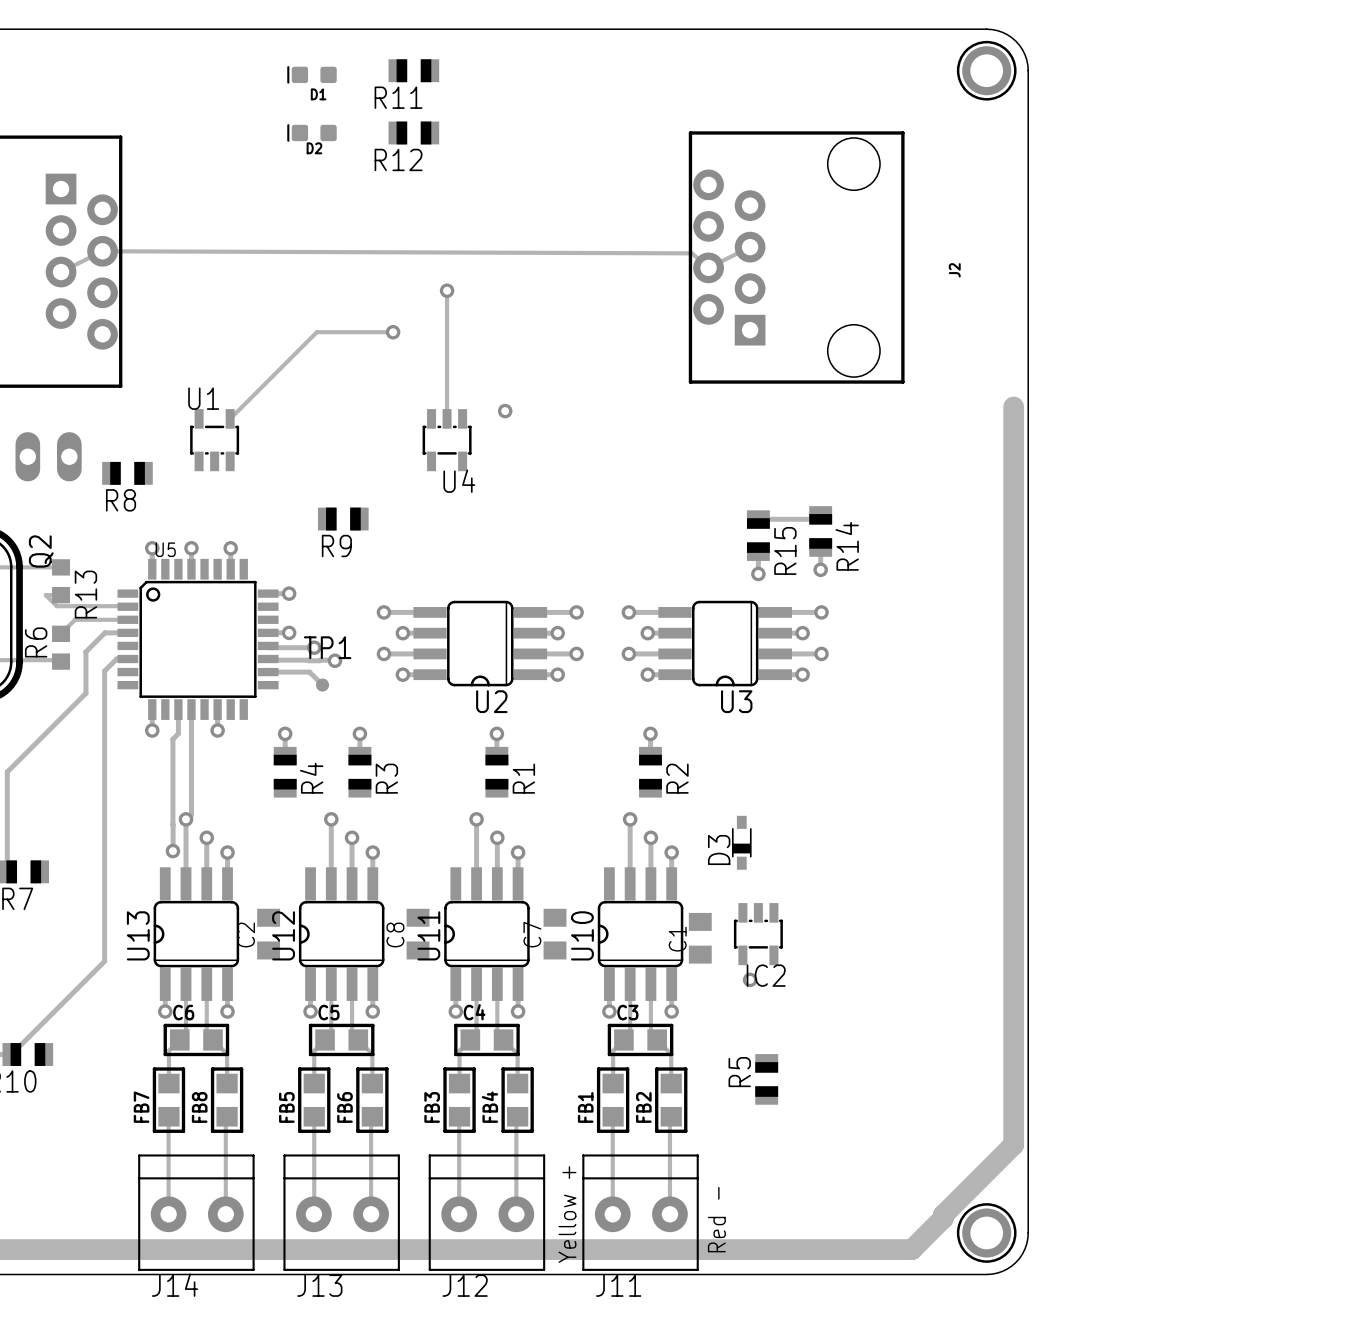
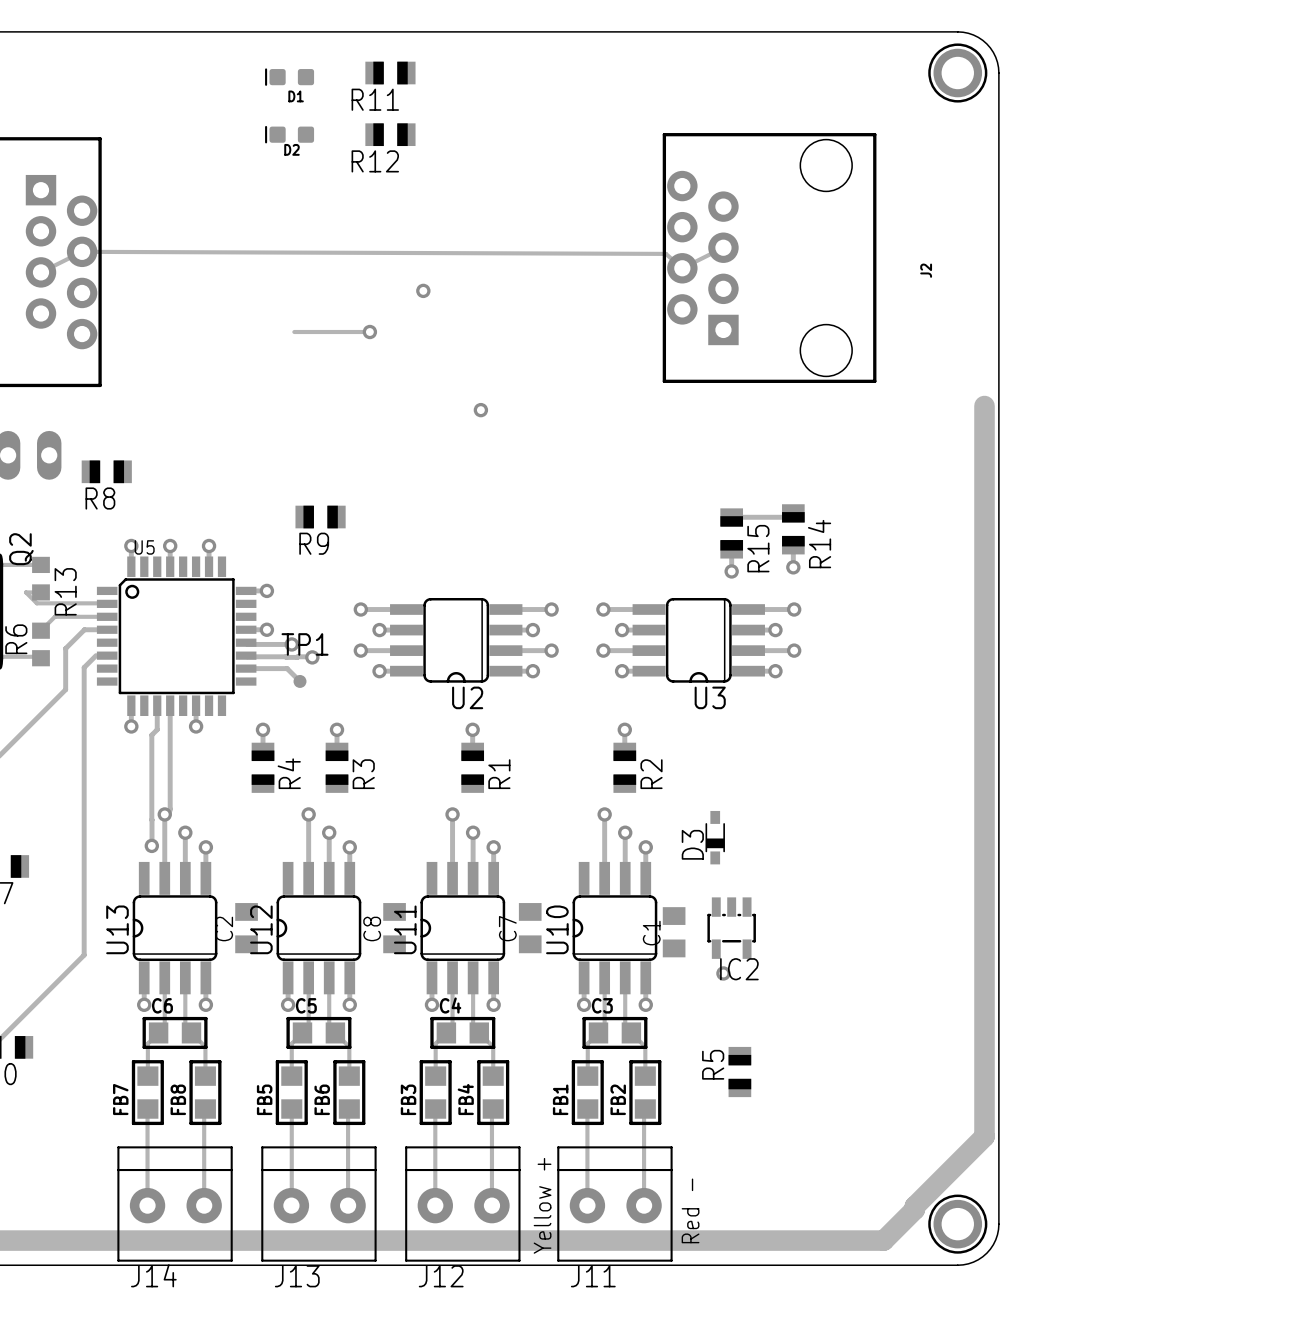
track: (447, 290) (447, 418) -> none
track: (316, 332) (230, 418) -> none
U1: (214, 440) -> none
U4: (447, 440) -> none

